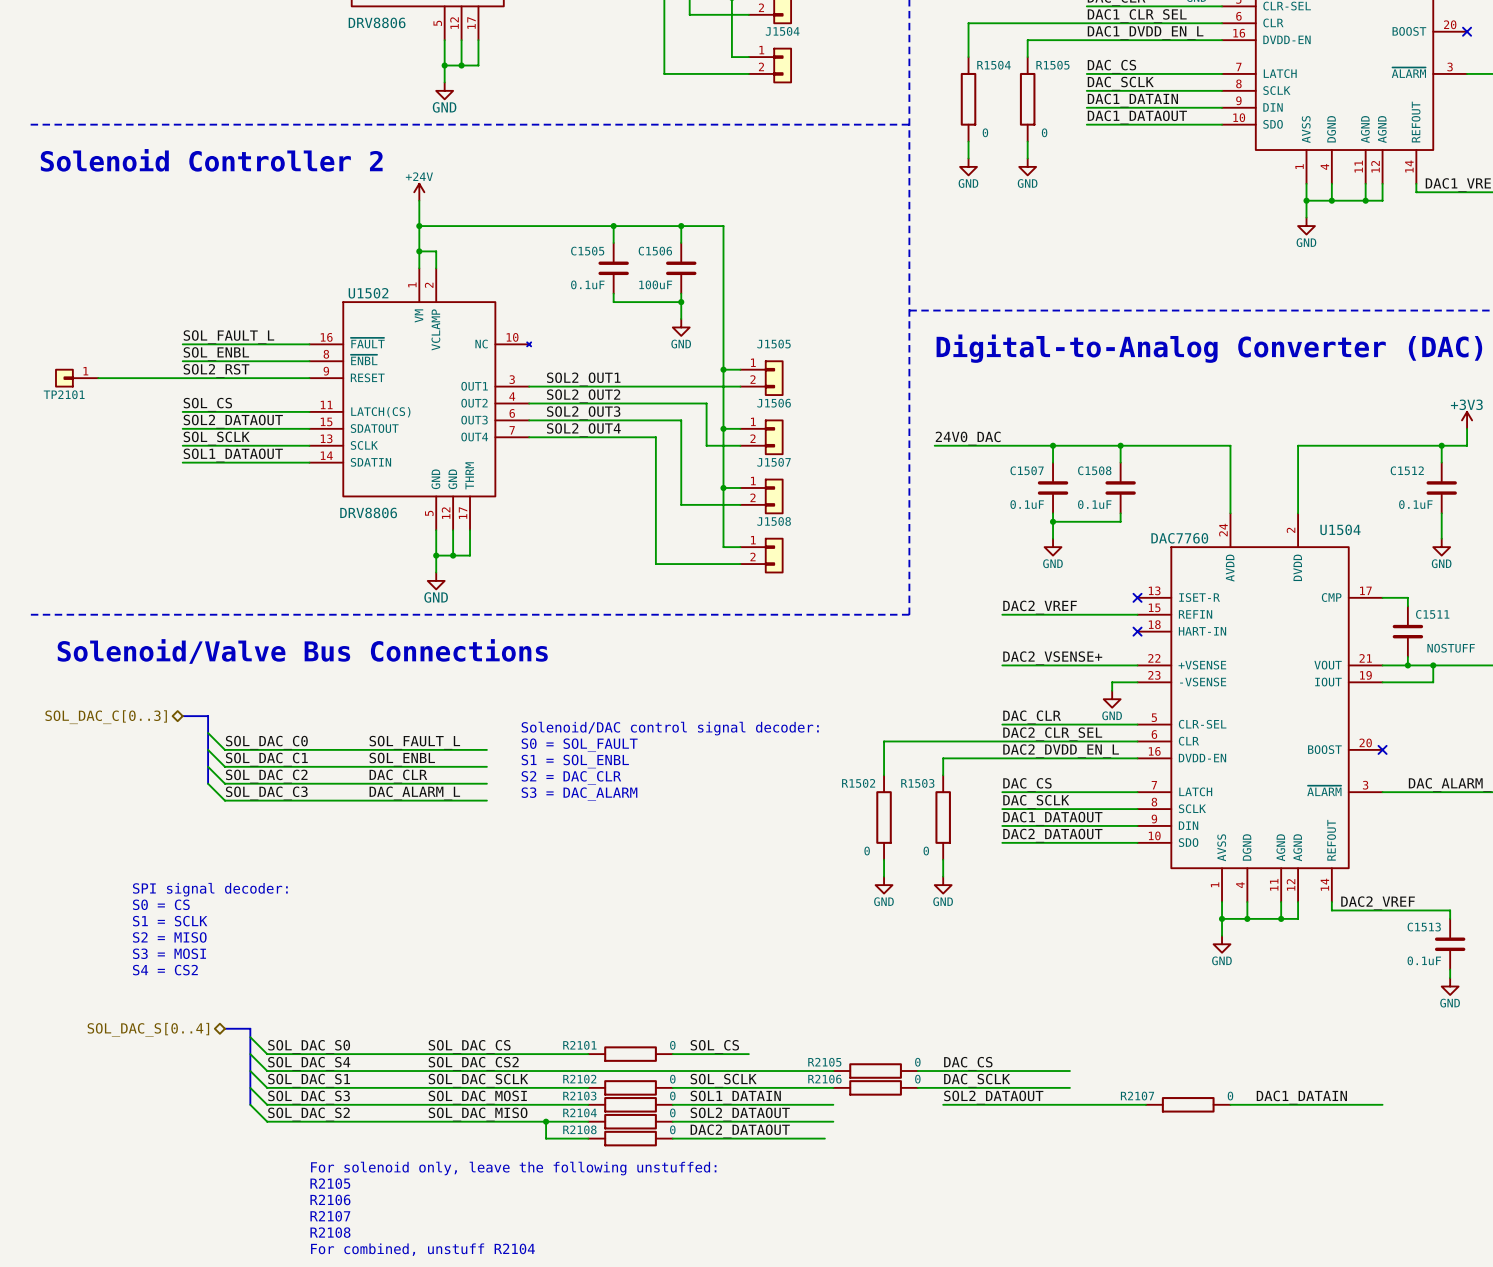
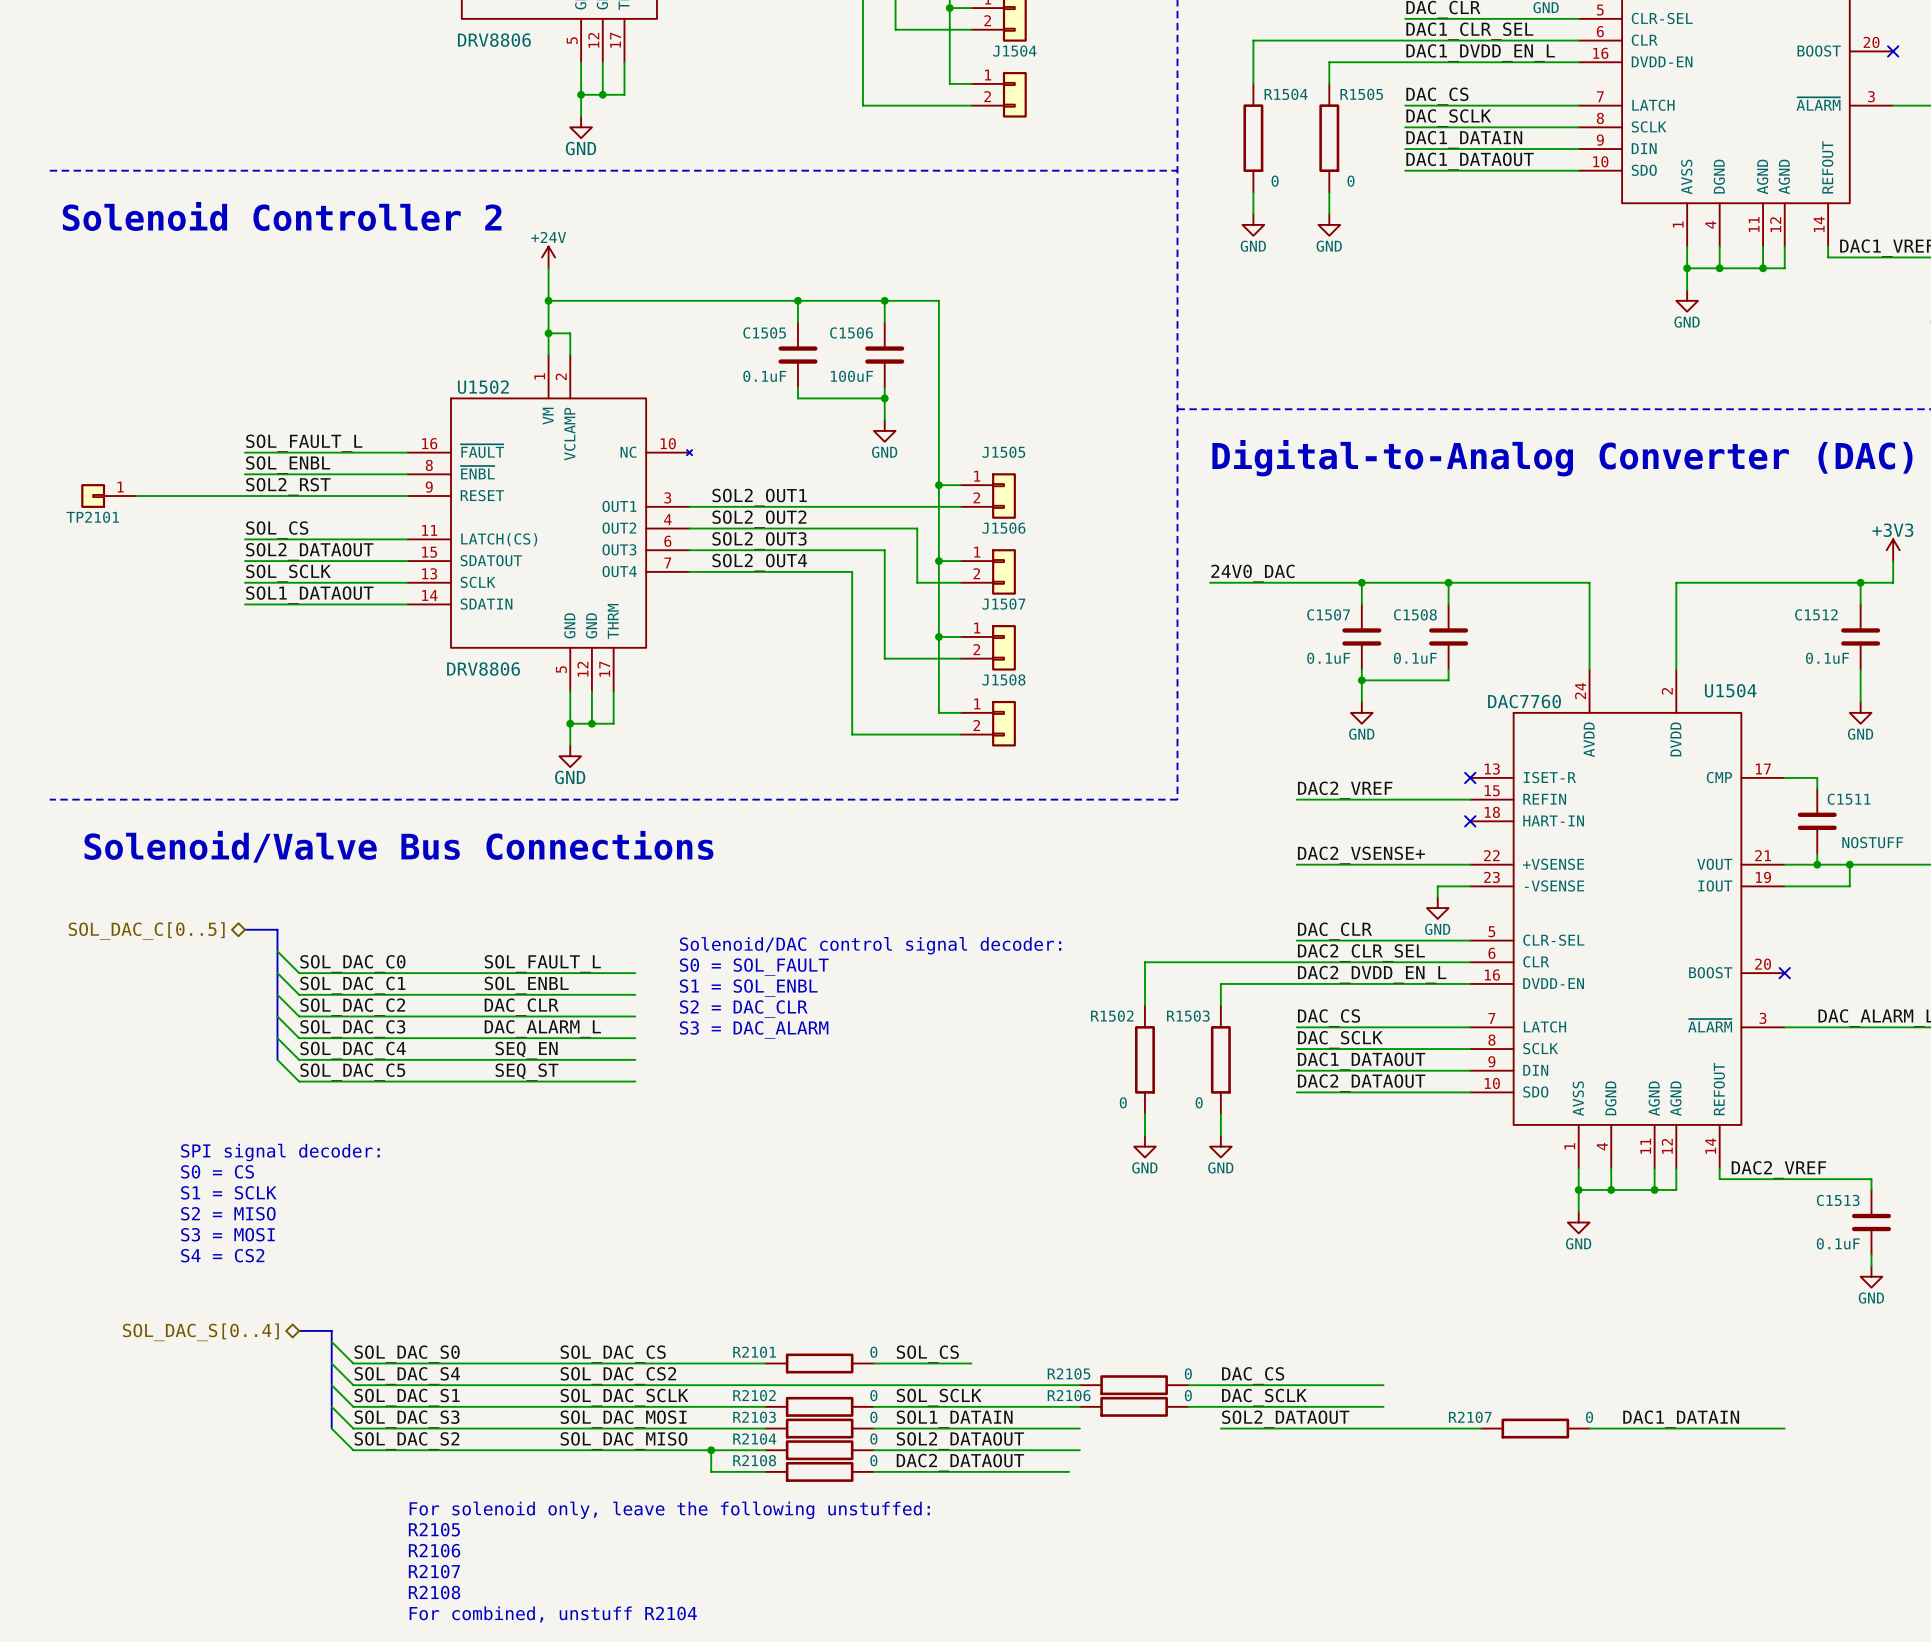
hierarchical label: SOL_DAC_C[0..3] (106, 717) -> SOL_DAC_C[0..5] (146, 931)
bus: none -> (277, 1016) (277, 1059)
wire: none -> (277, 1038) (299, 1059) (635, 1059)
label: none -> SOL_DAC_C4 (353, 1050)
label: none -> SEQ_EN (526, 1050)
wire: none -> (277, 1059) (299, 1081) (635, 1081)
label: none -> SOL_DAC_C5 (352, 1072)
label: none -> SEQ_ST (526, 1072)

